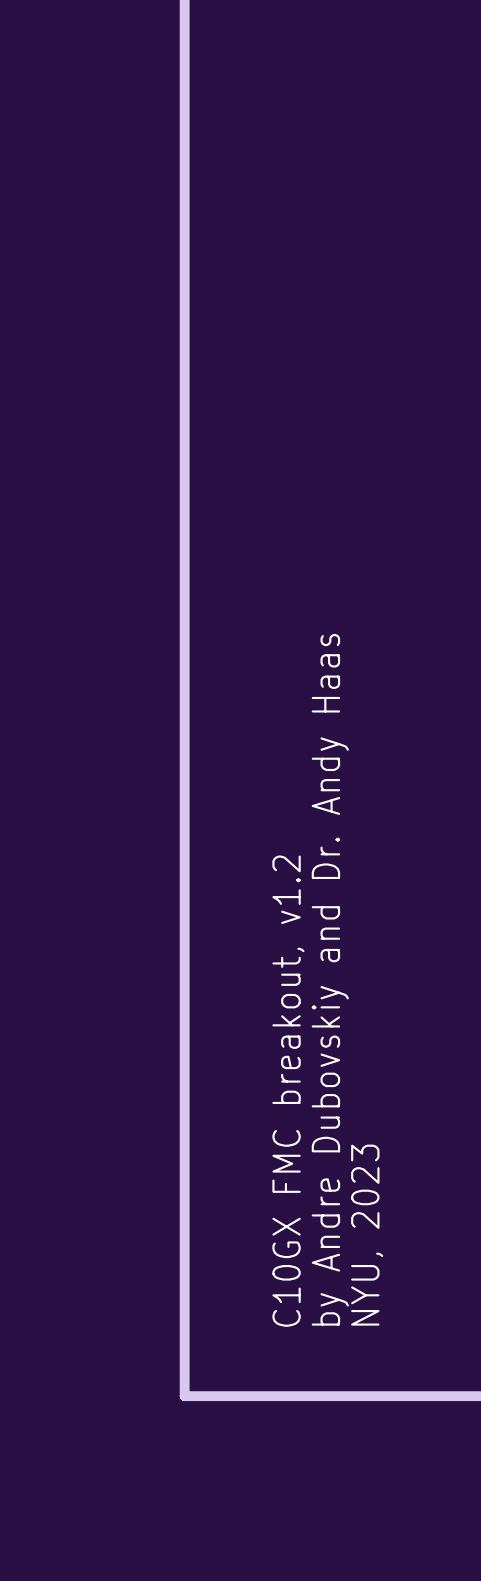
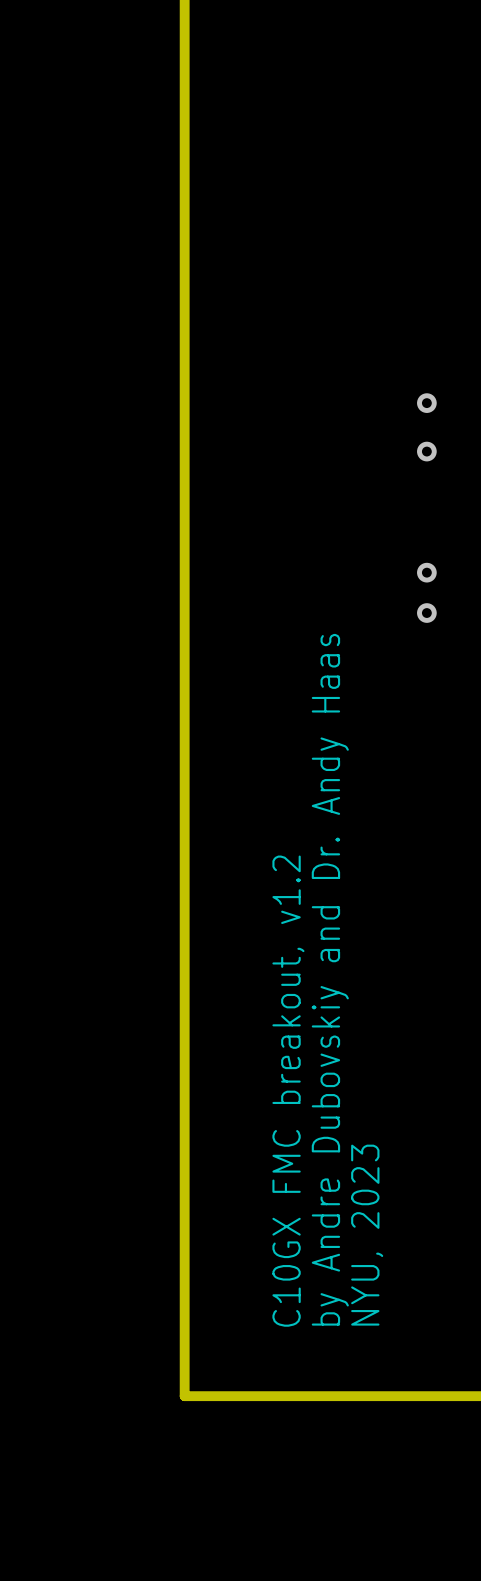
via: none -> (426, 403)
via: none -> (426, 451)
via: none -> (426, 572)
via: none -> (426, 613)

